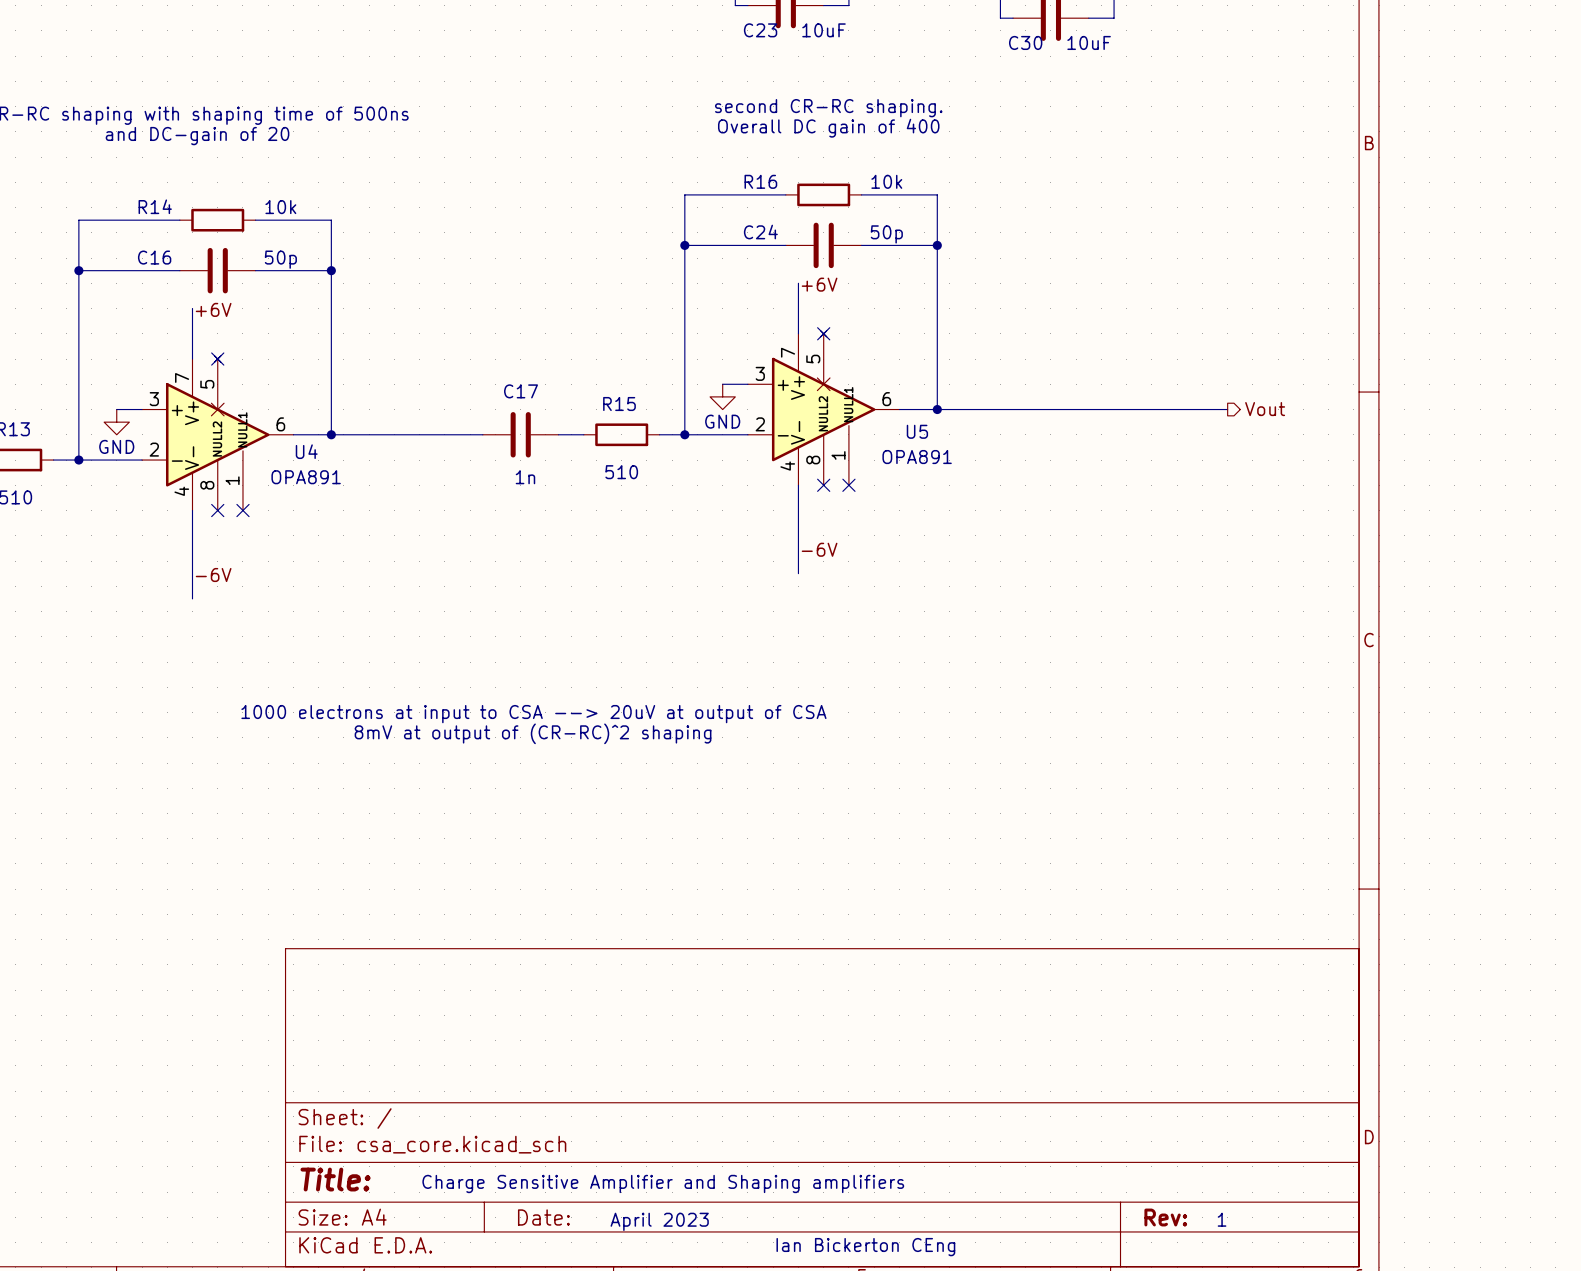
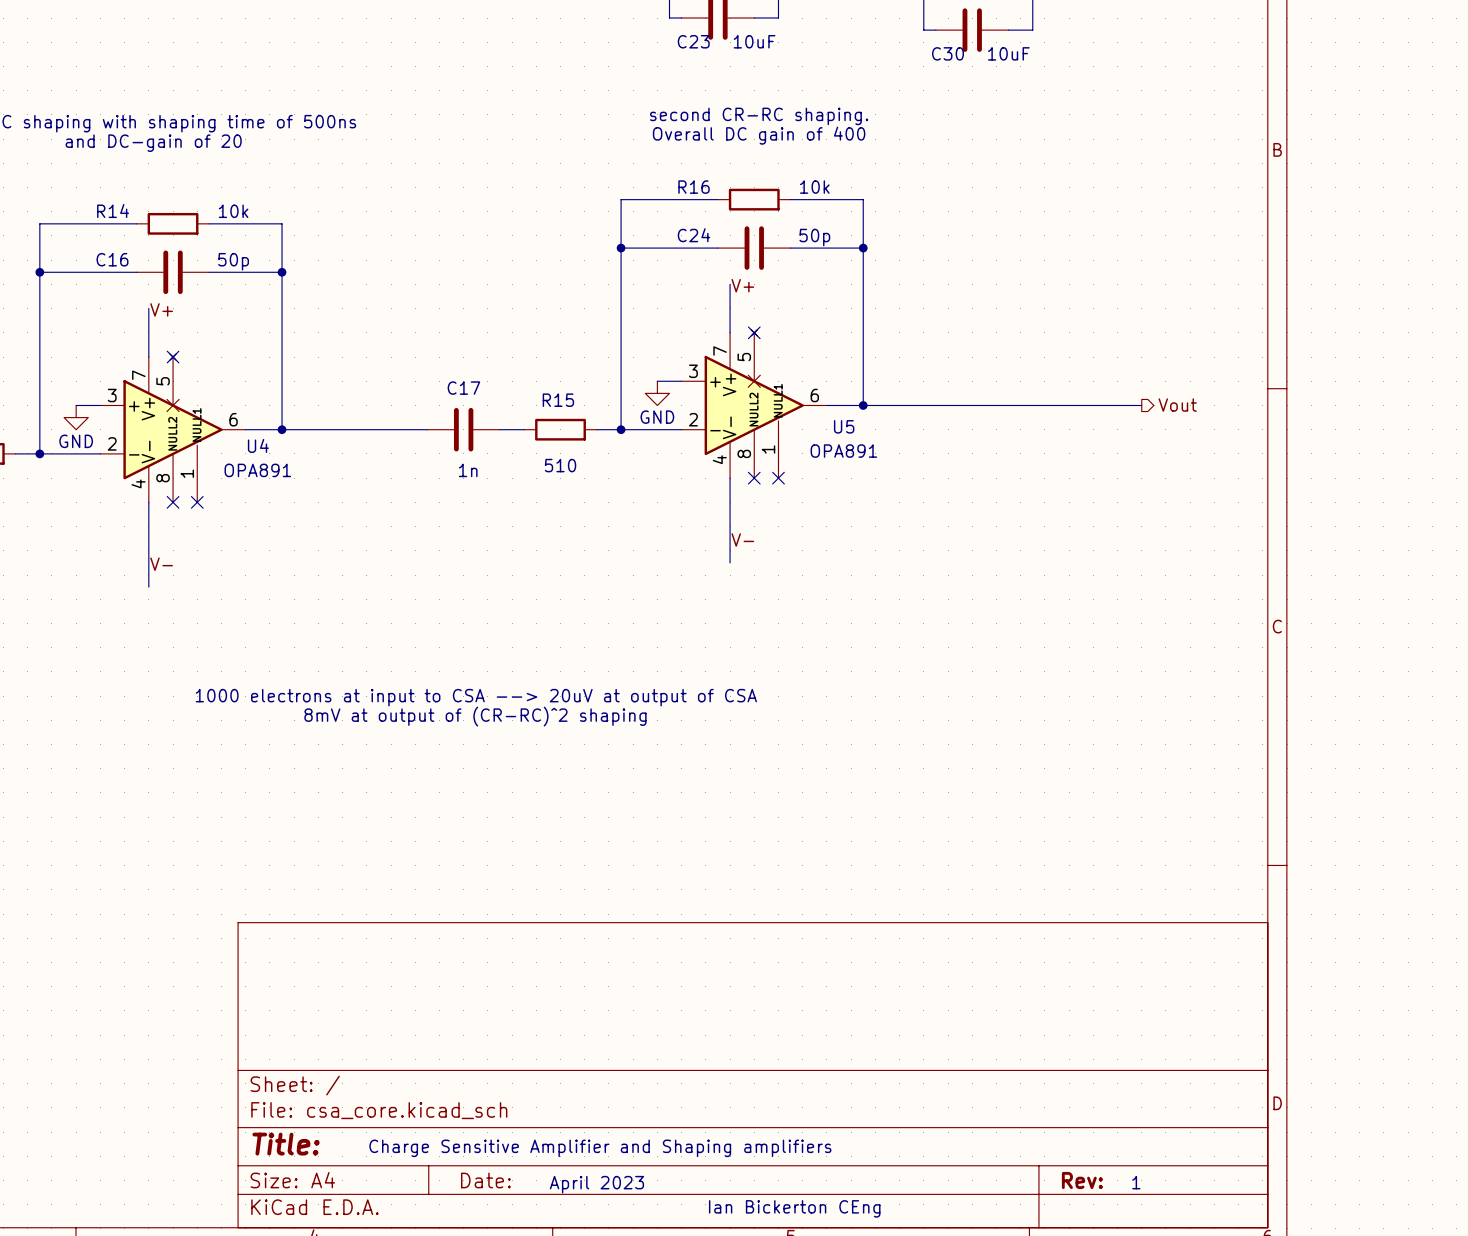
label: +6V (819, 284) -> V+ (742, 285)
label: +6V (213, 309) -> V+ (161, 309)
label: -6V (819, 549) -> V- (742, 539)
label: -6V (213, 575) -> V- (161, 564)

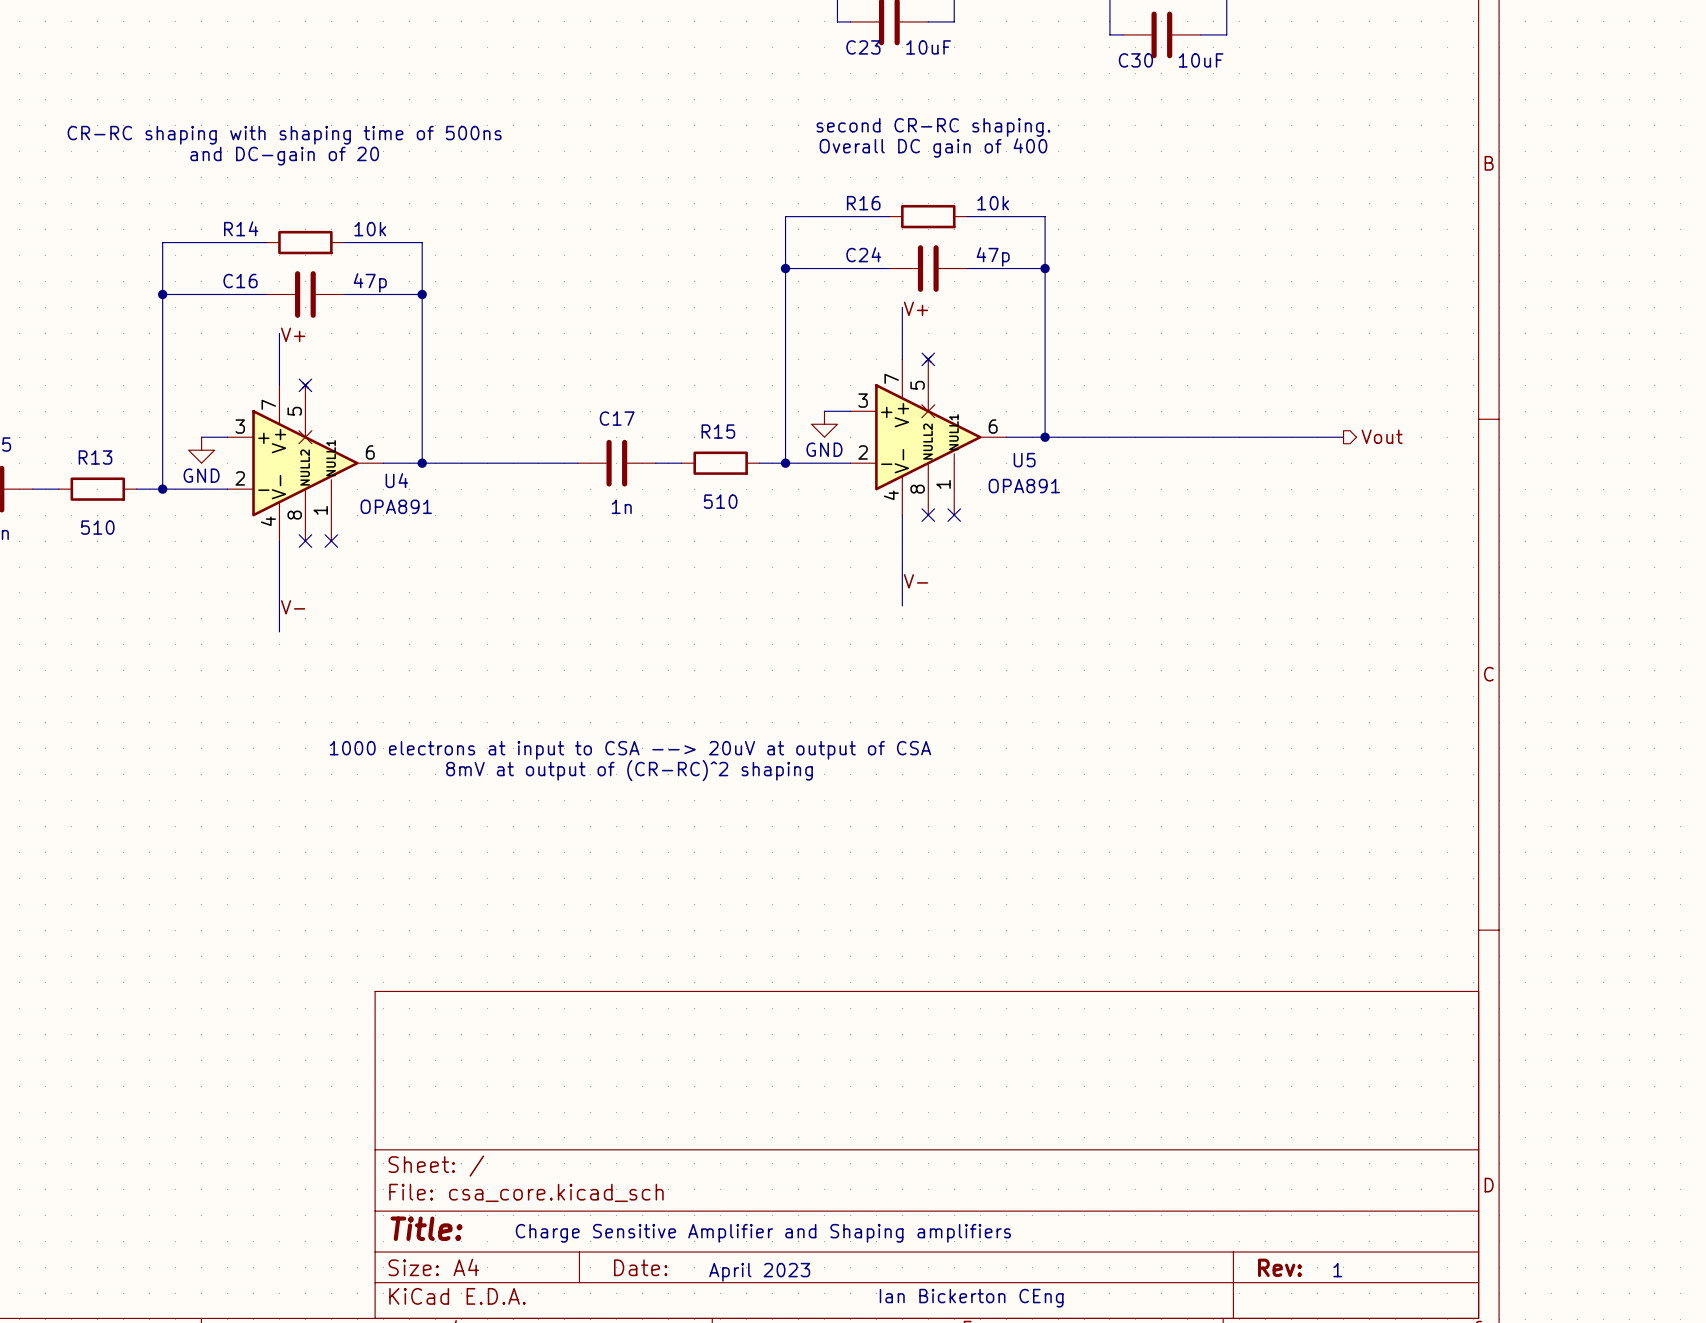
C24 value: 50p (814, 237) -> 47p (993, 256)
C16 value: 50p (233, 261) -> 47p (370, 282)

